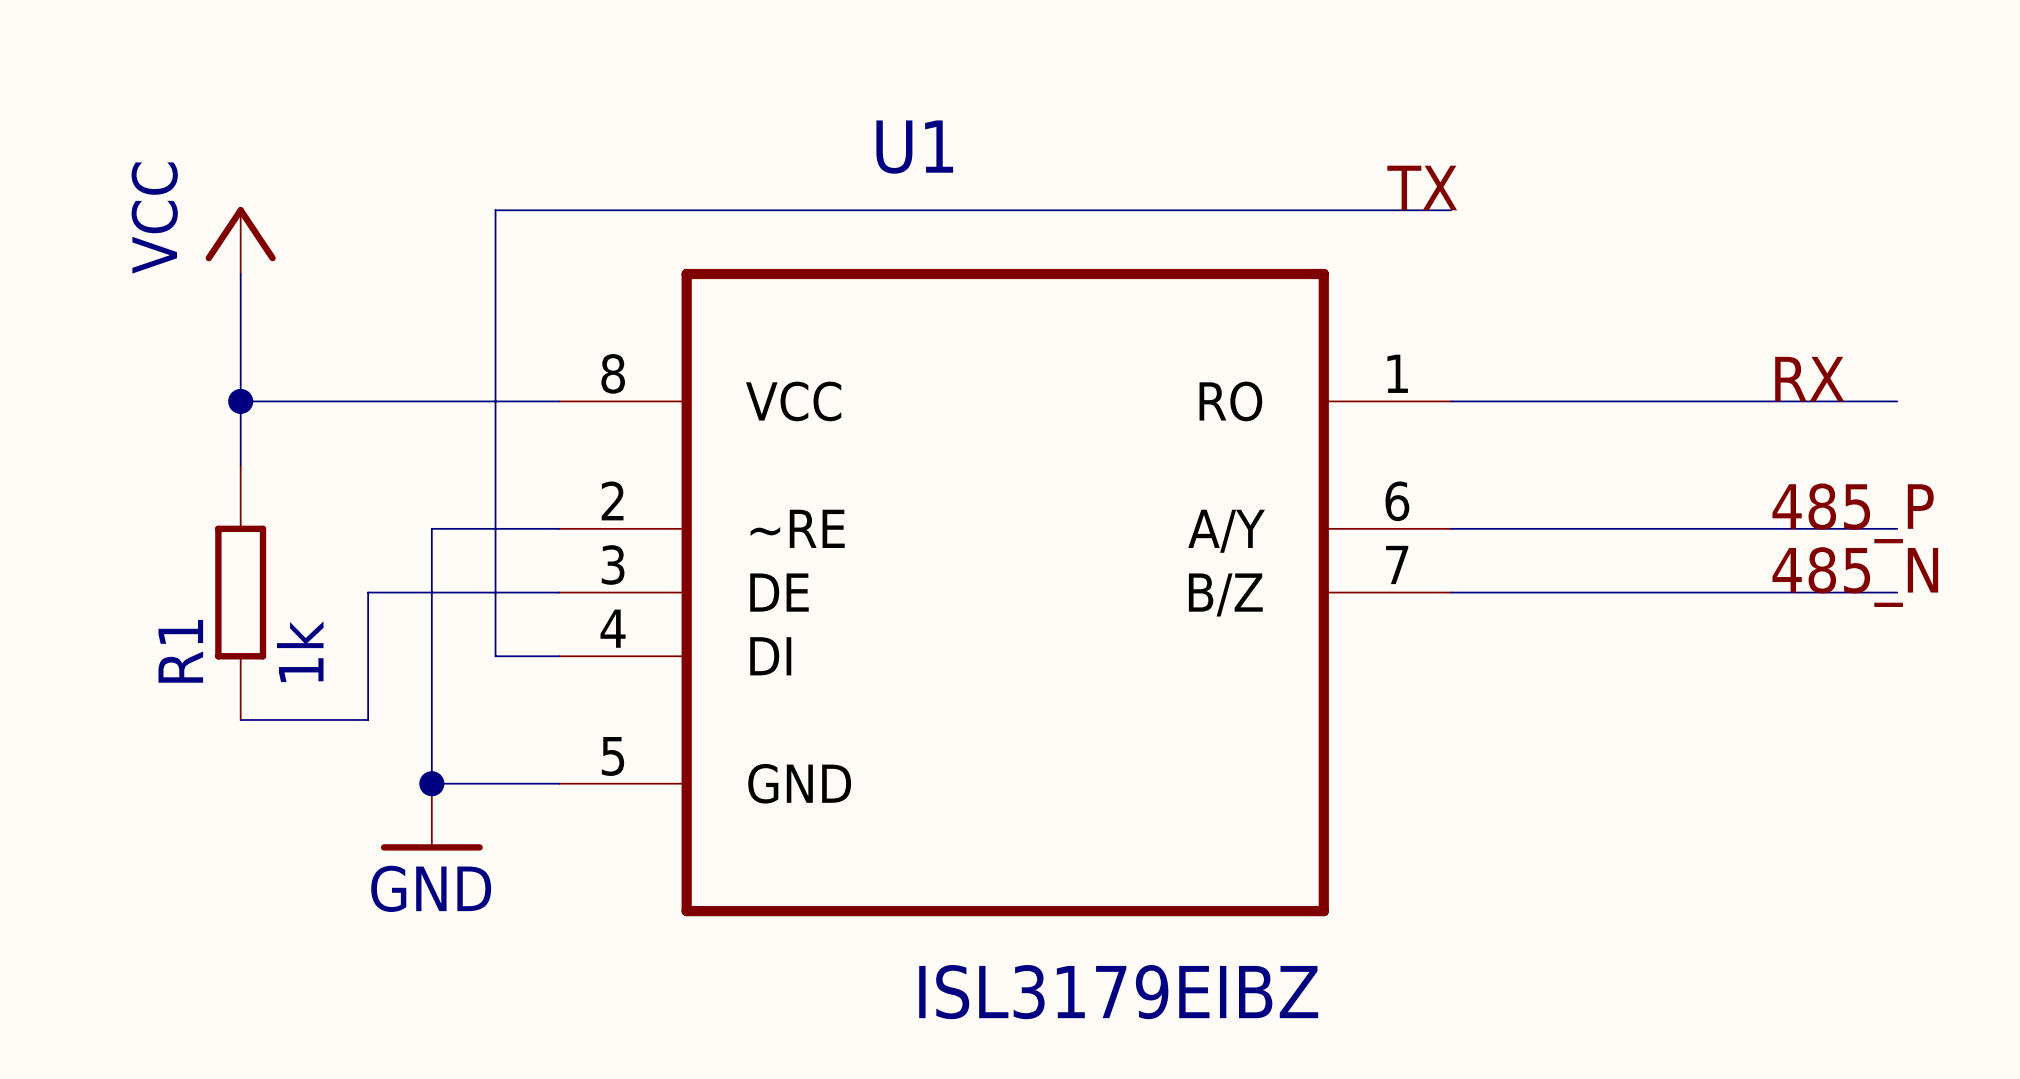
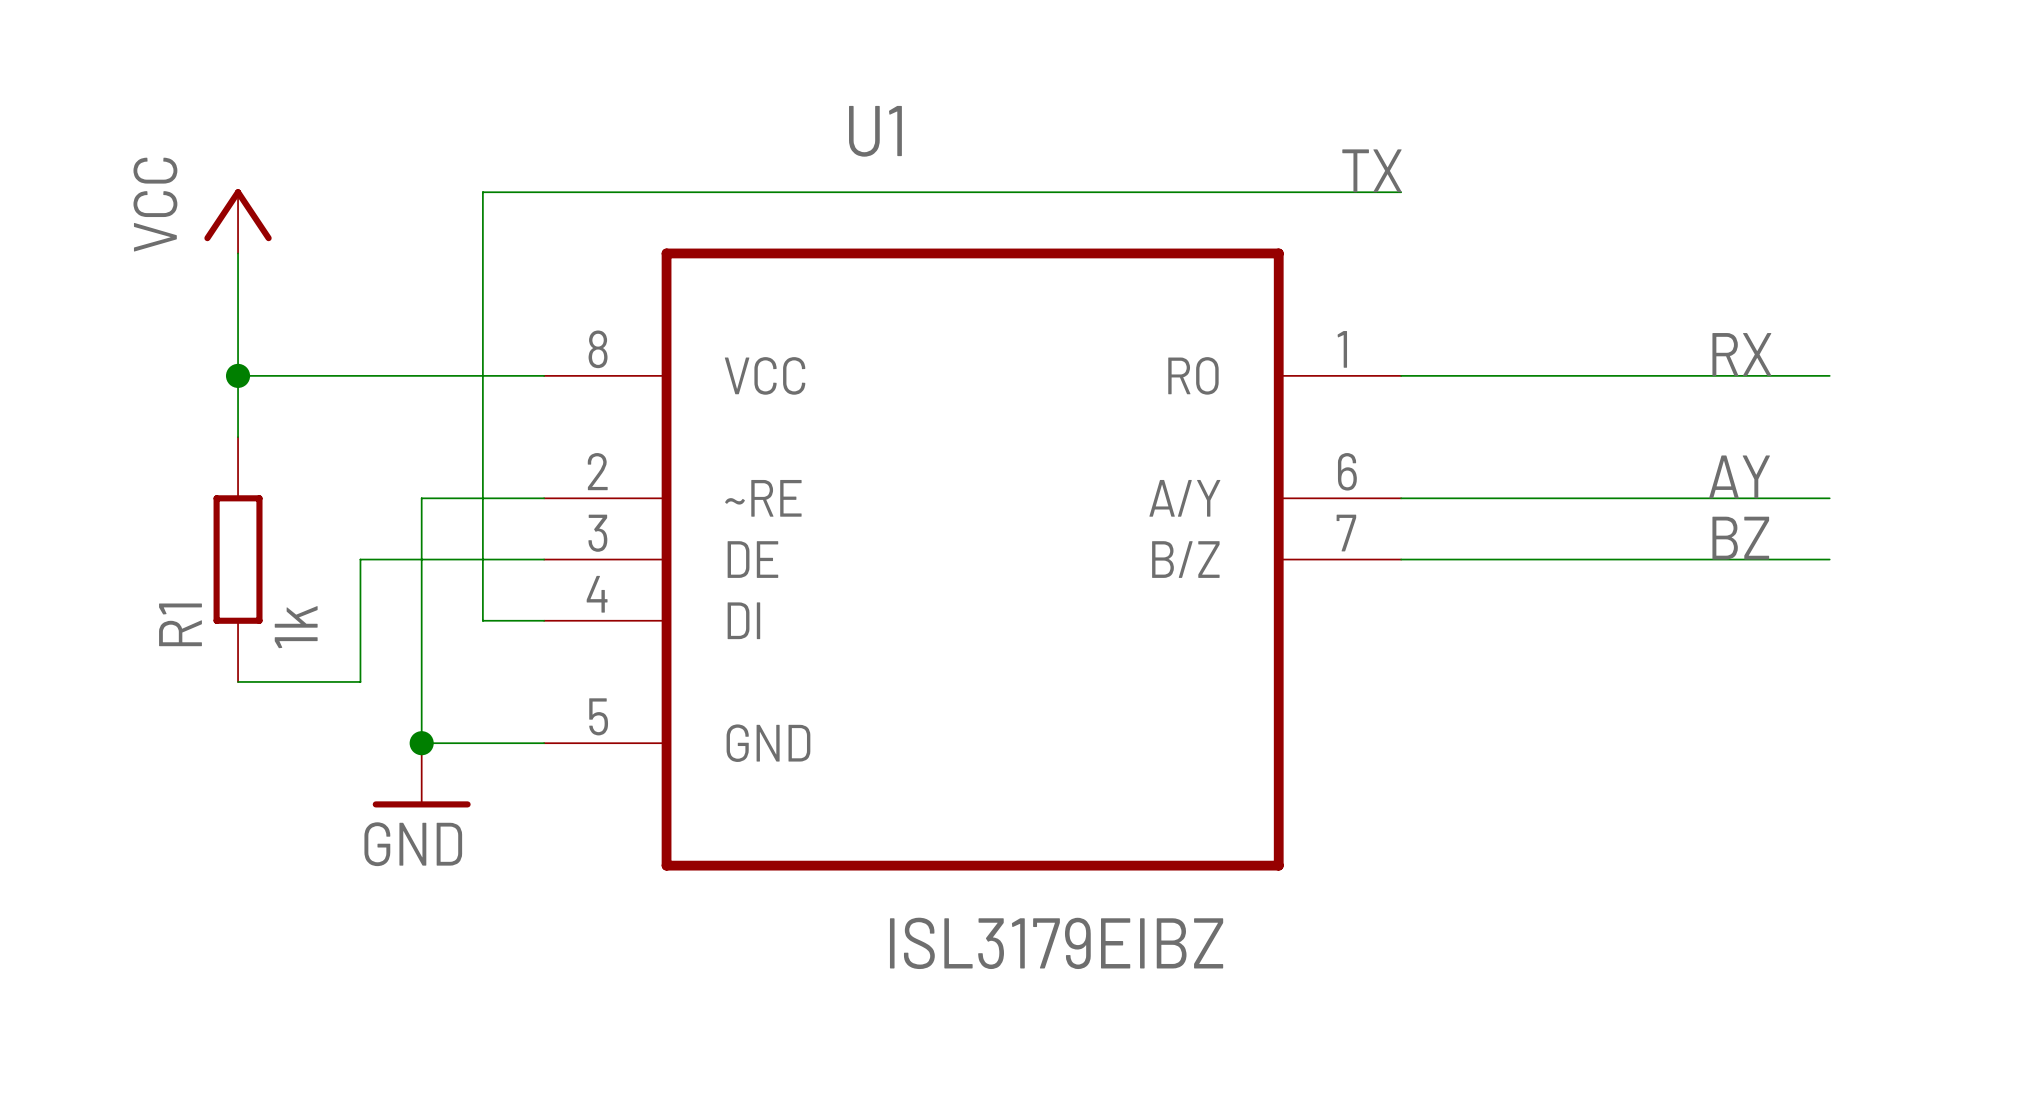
label: 485_P (1853, 513) -> AY (1739, 476)
label: 485_N (1855, 577) -> BZ (1740, 538)

